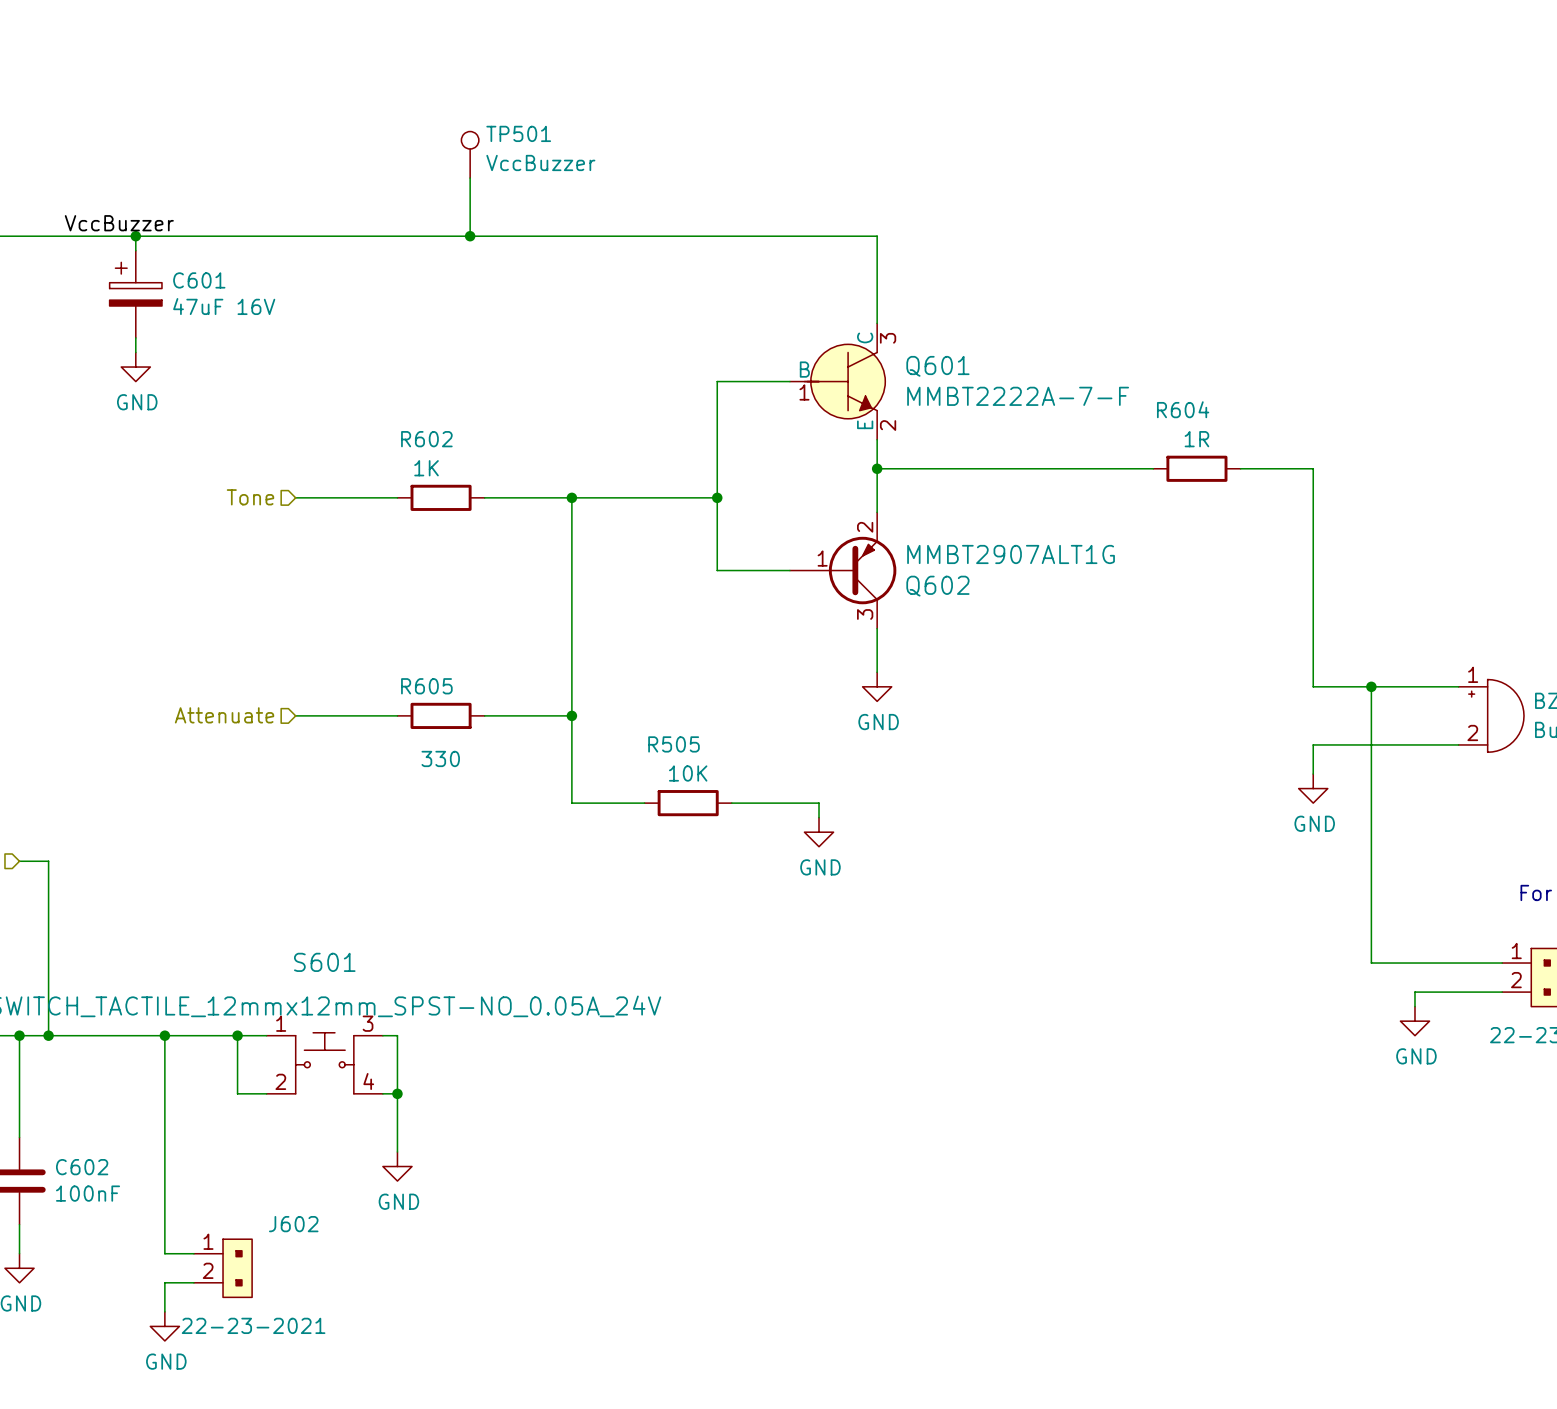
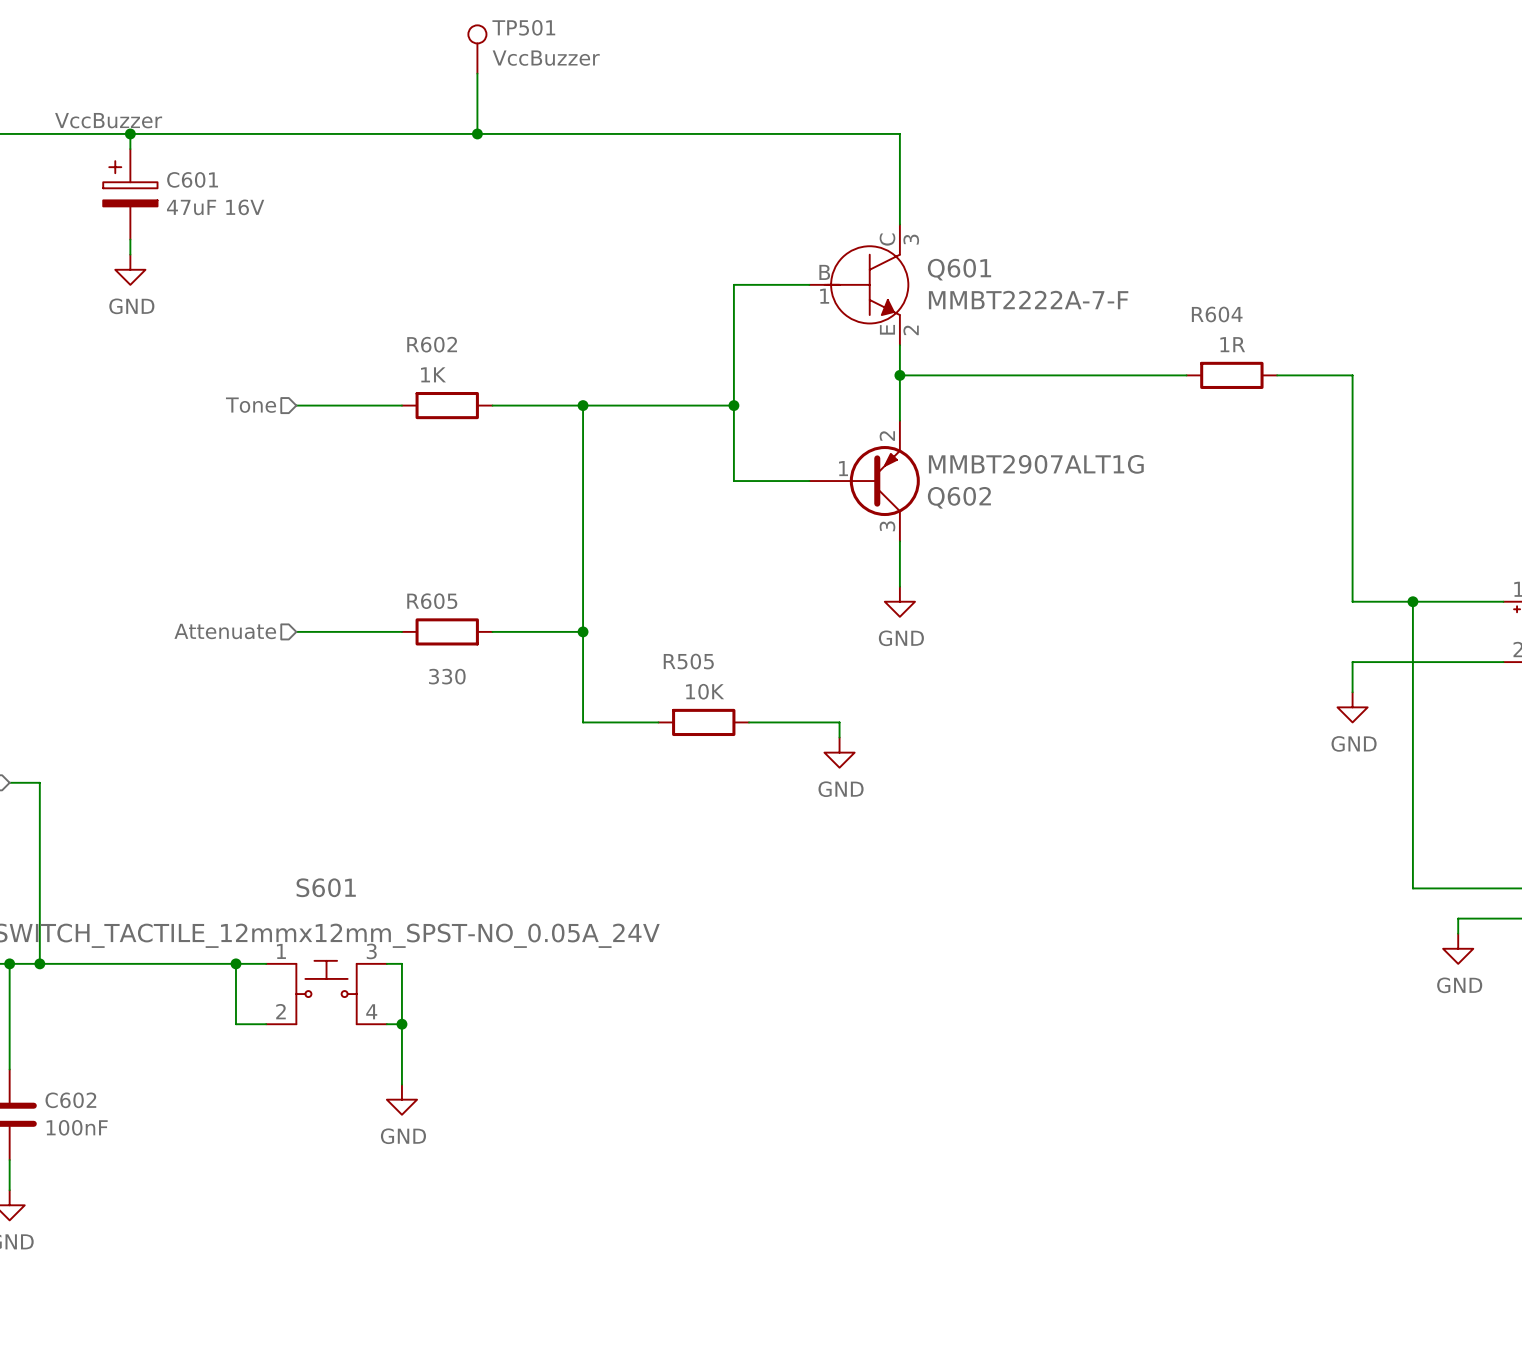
wire: (164, 1035) (164, 1253) (193, 1253) -> none
junction: (164, 1035) -> none
J602: 22-23-2021 (223, 1268) -> none
wire: (193, 1282) (164, 1282) (164, 1311) -> none
power symbol: GND (164, 1326) -> none

